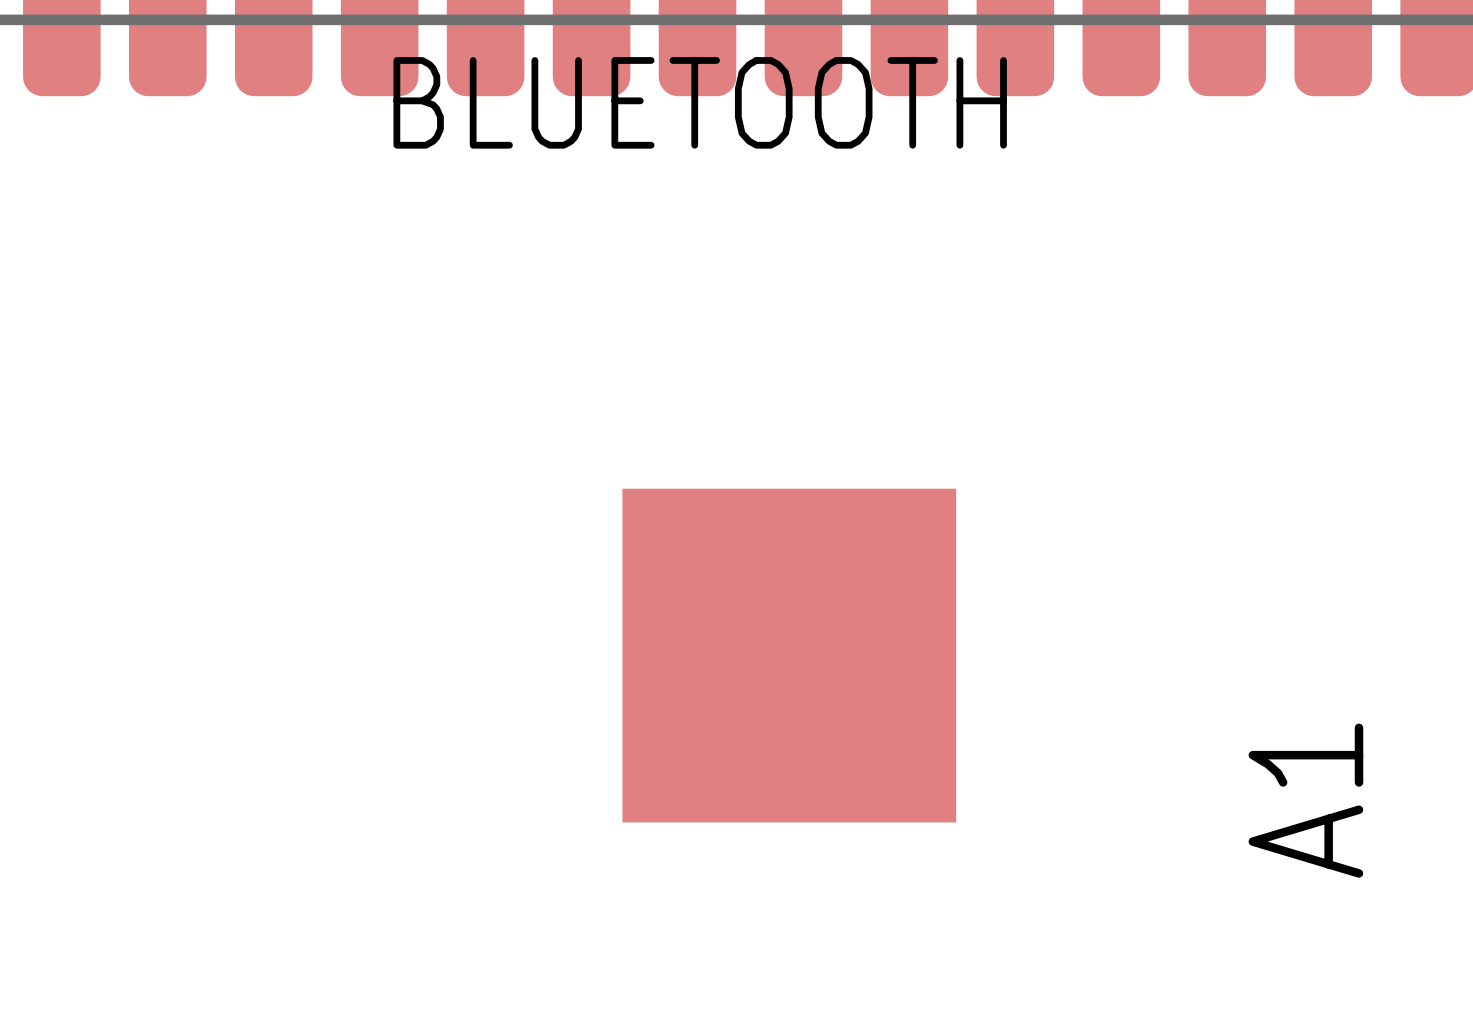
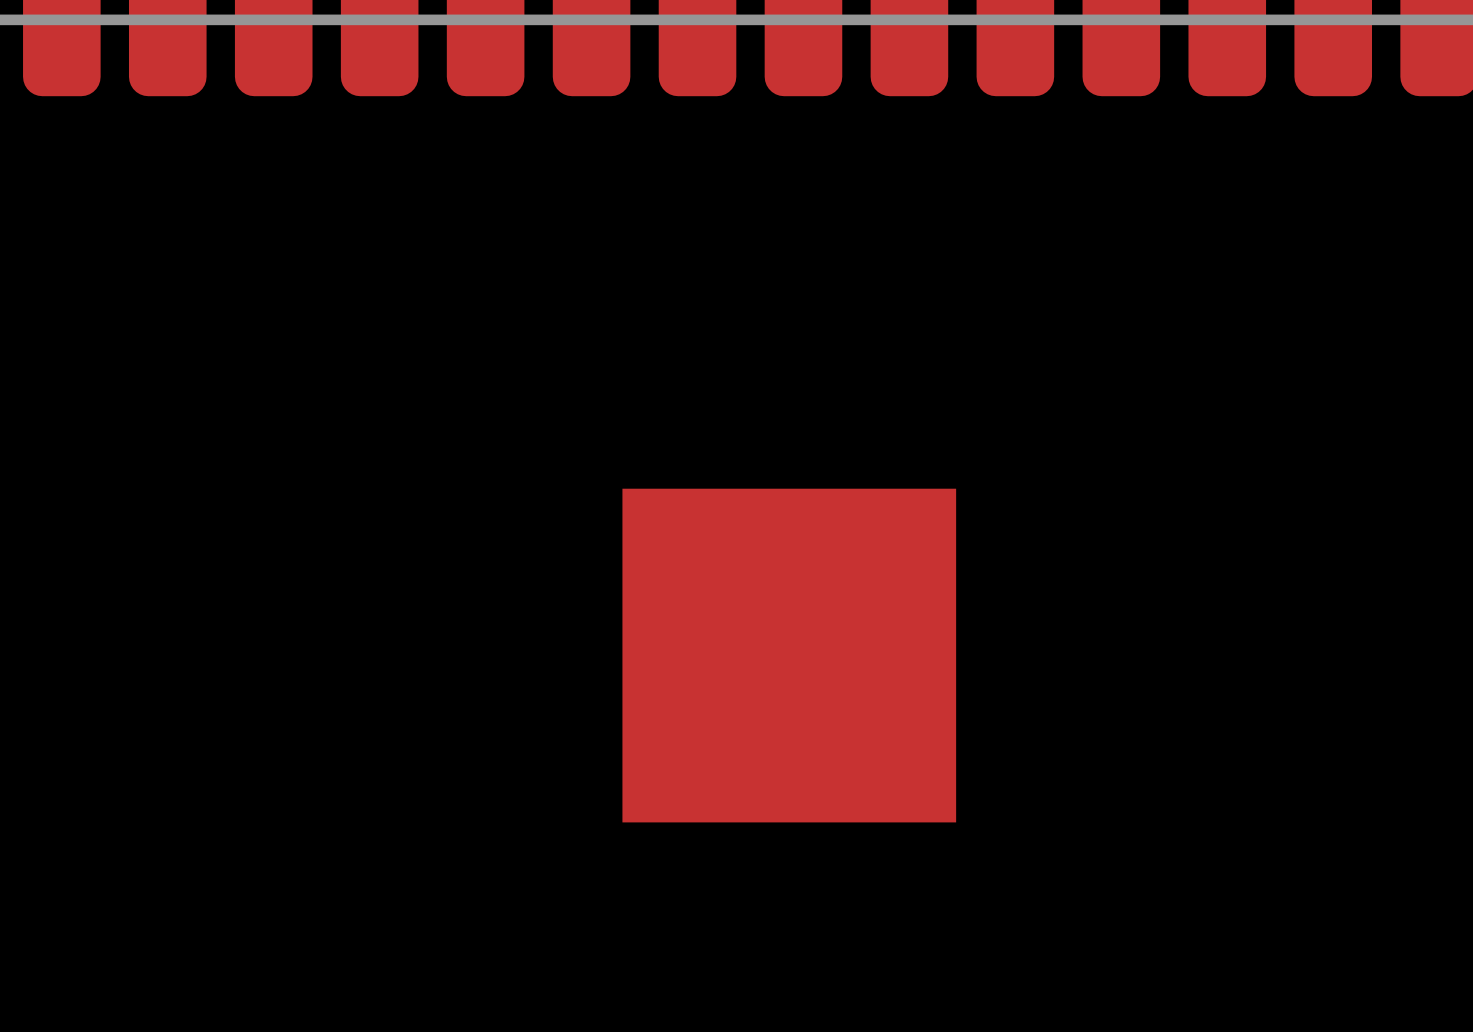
text: BLUETOOTH (700, 102) -> none
A1 name: A1 (1305, 800) -> none

